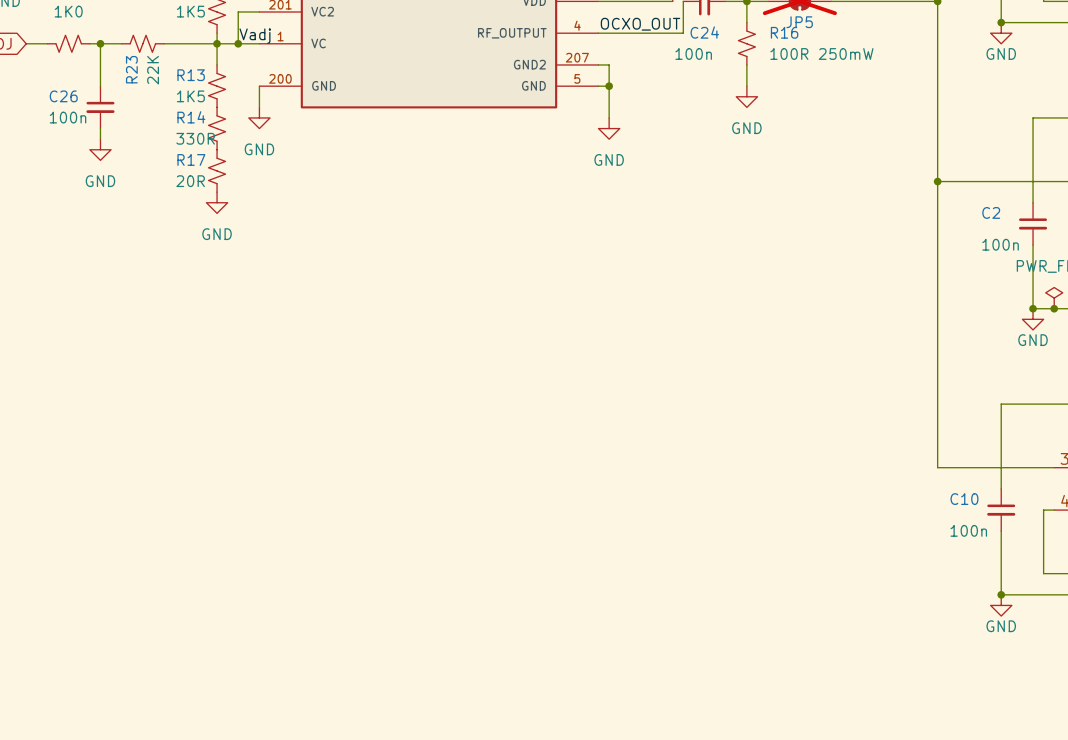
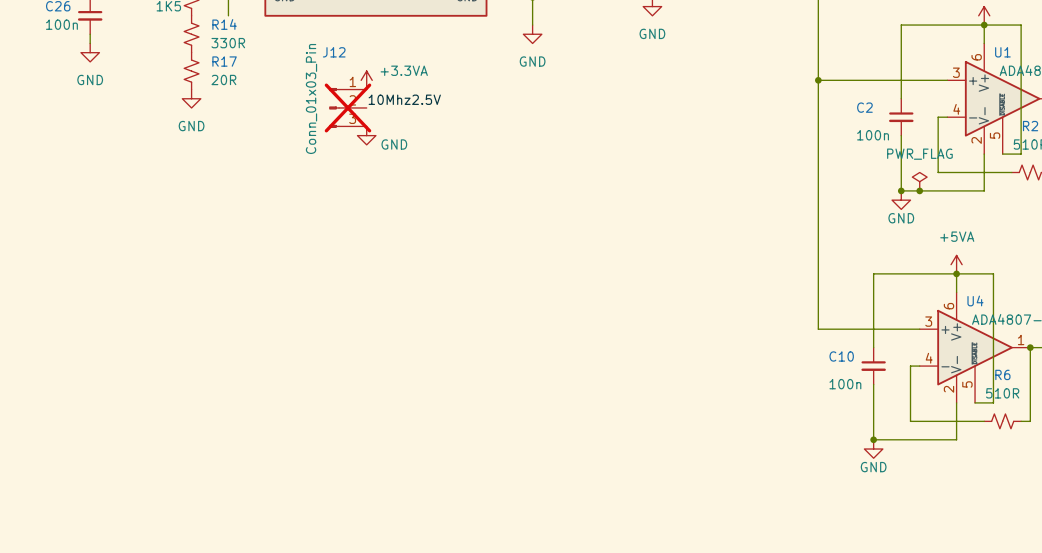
R14 name position: R14 (191, 117) -> R14 (224, 24)
power symbol: GND (259, 117) -> none
R14 value position: 330R (195, 138) -> 330R (228, 43)
R17 name position: R17 (191, 159) -> R17 (224, 61)
R17 value position: 20R (190, 181) -> 20R (223, 79)
power symbol: none -> +3.3VA (366, 80)
label: none -> 10Mhz2.5V (404, 99)
J12: none -> Conn_01x03_Pin (347, 107)
power symbol: none -> GND (366, 135)

